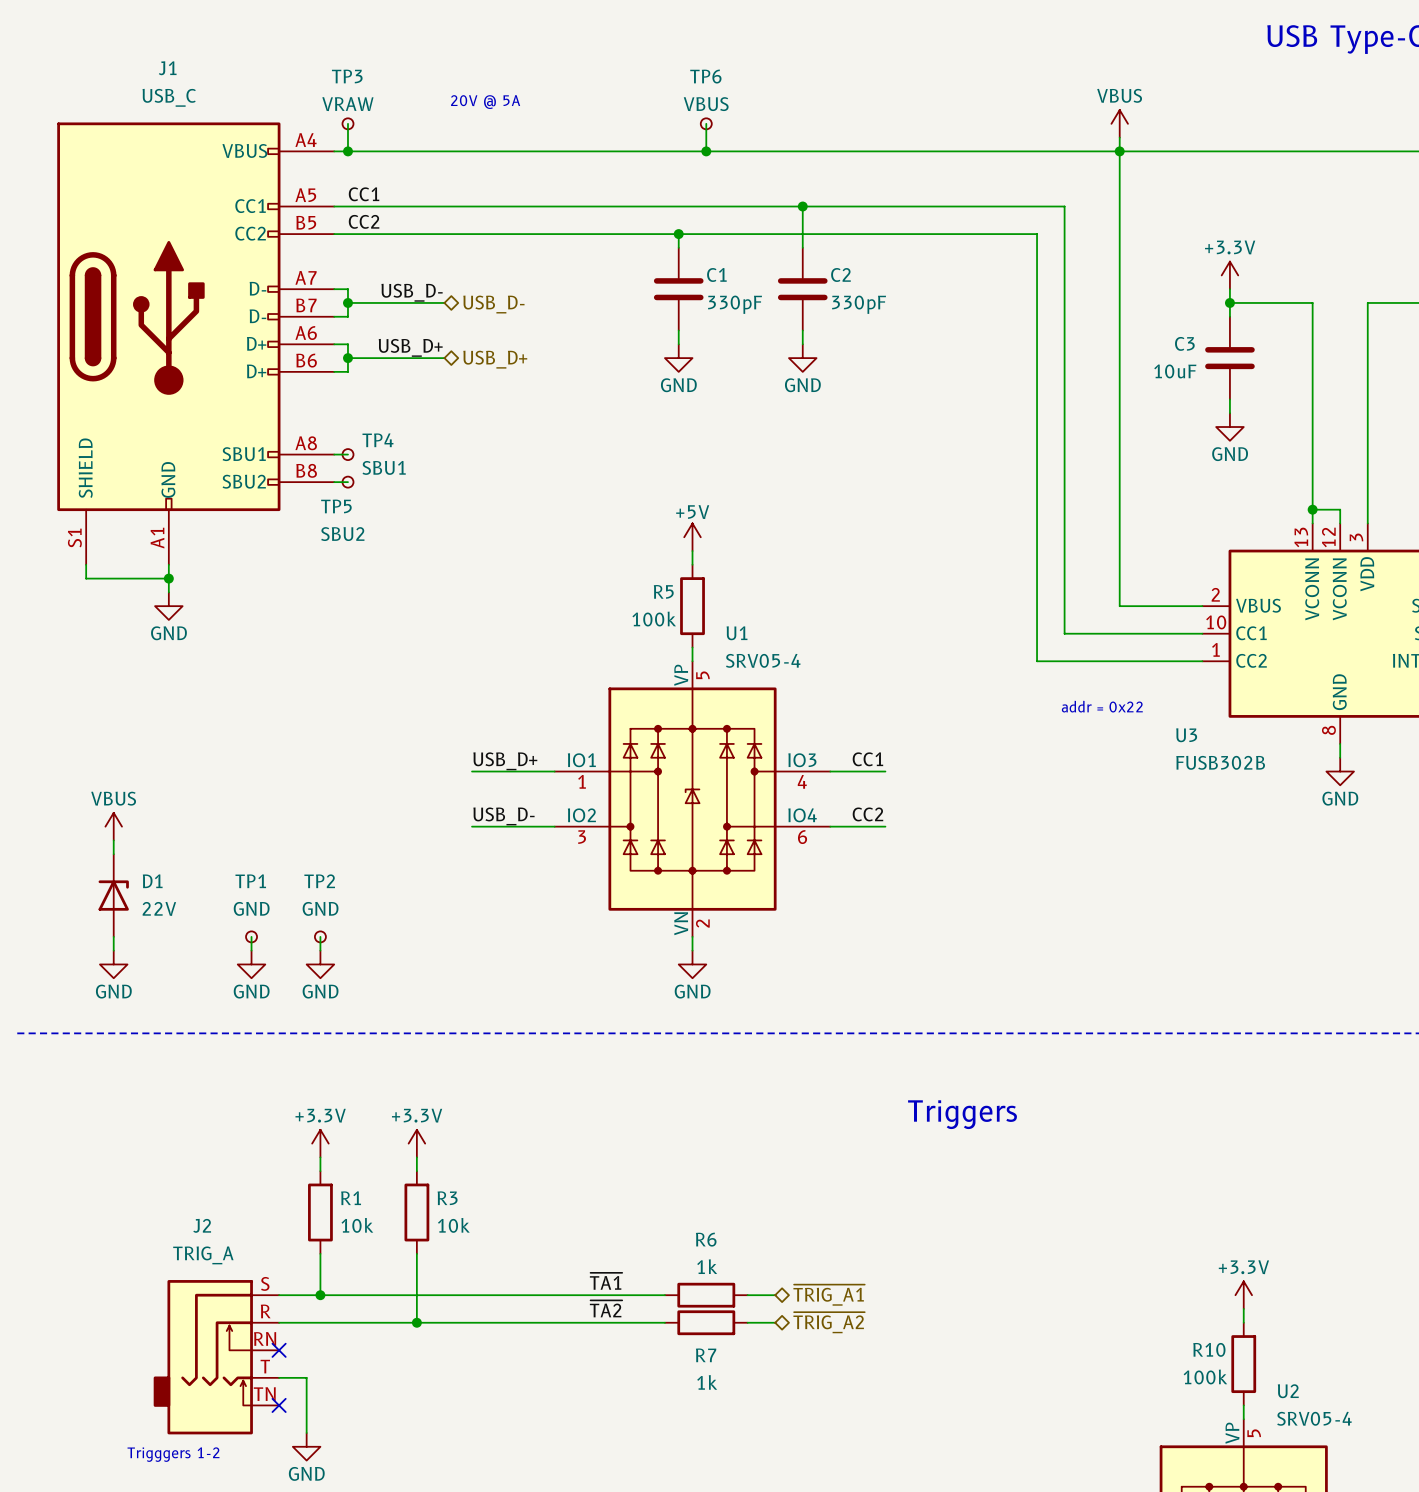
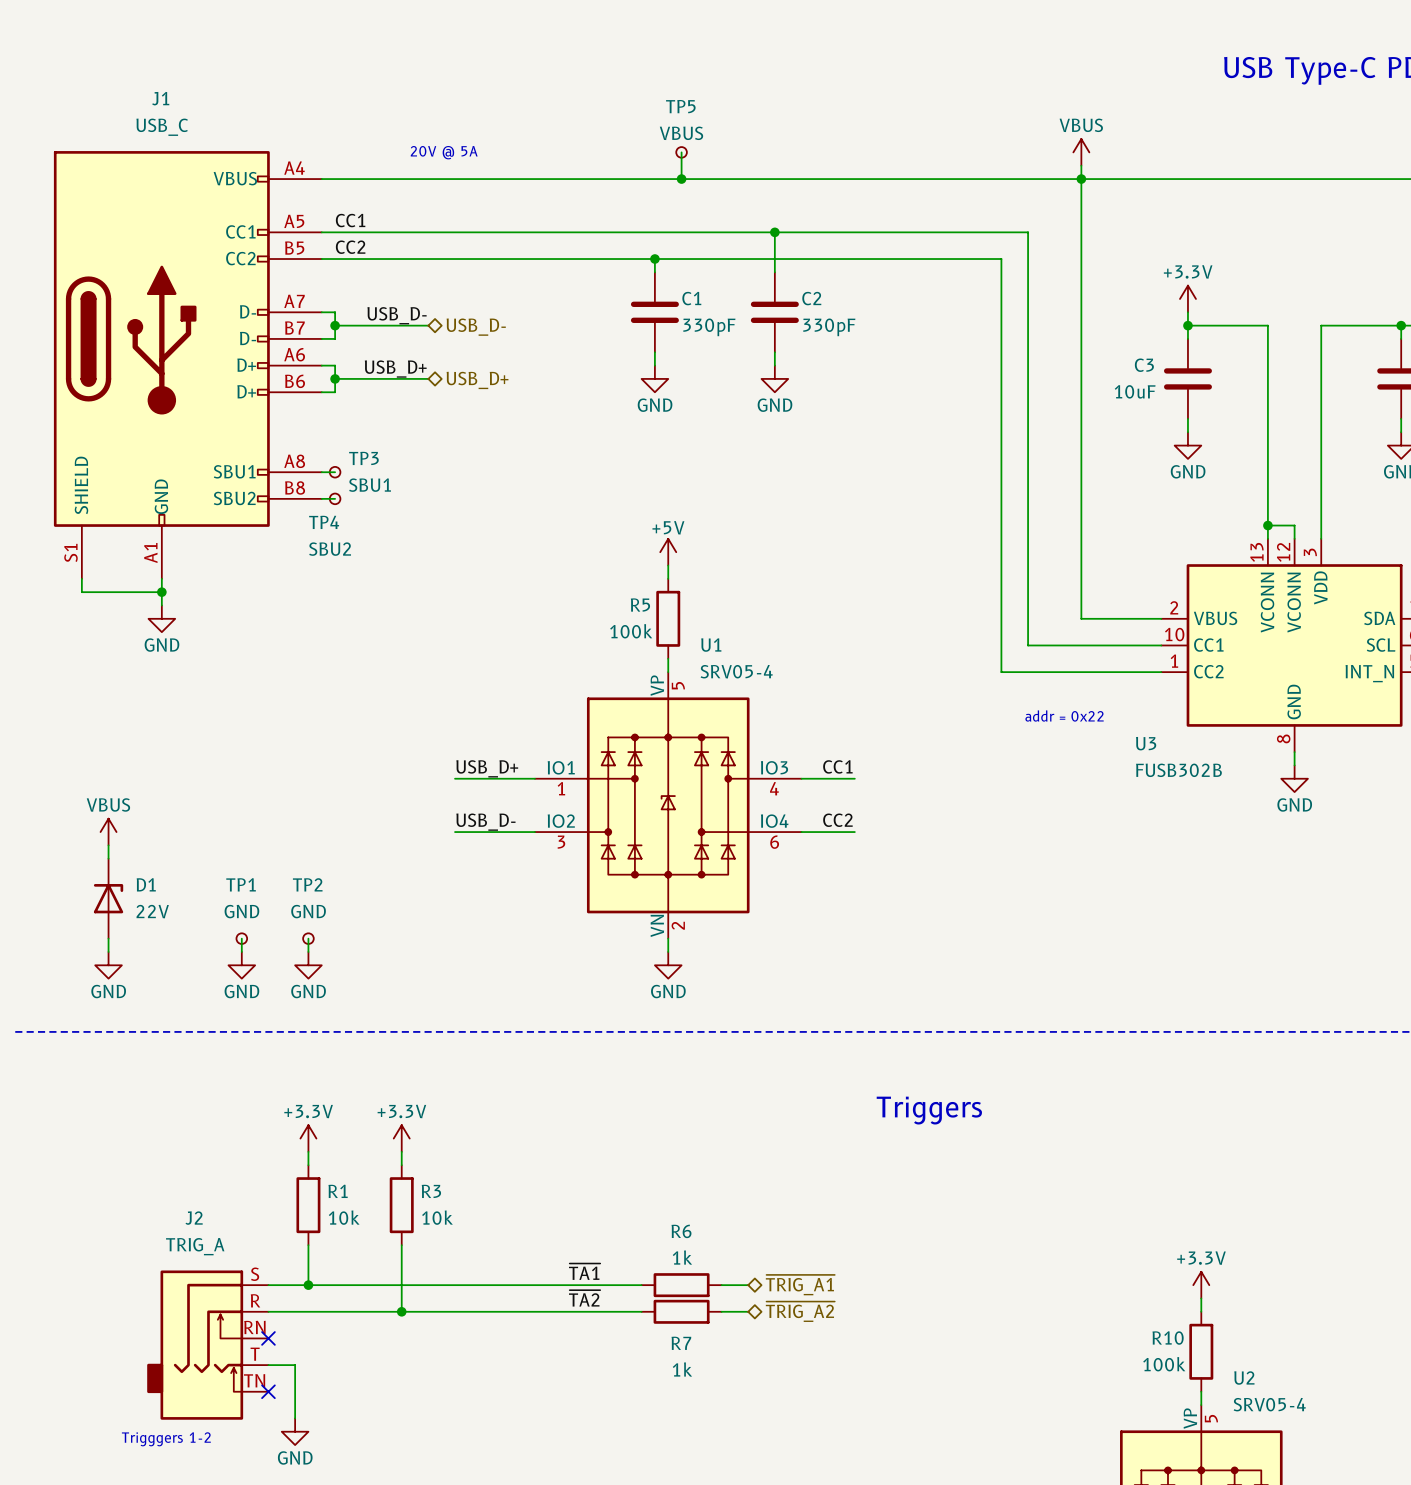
TP6 name: TP6 (705, 76) -> TP5 (680, 106)
text position: 20V @ 5A (485, 102) -> 20V @ 5A (444, 152)
wire: (347, 123) (347, 151) -> none
TP3: VRAW (347, 123) -> none
junction: (347, 151) -> none
TP4 name: TP4 (378, 440) -> TP3 (363, 458)
TP5 name: TP5 (336, 506) -> TP4 (324, 522)

